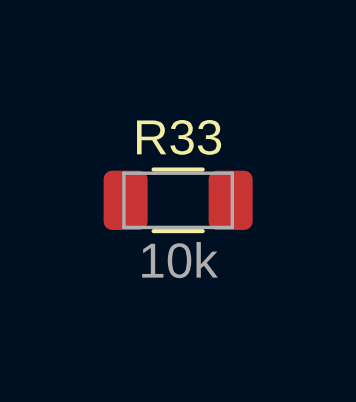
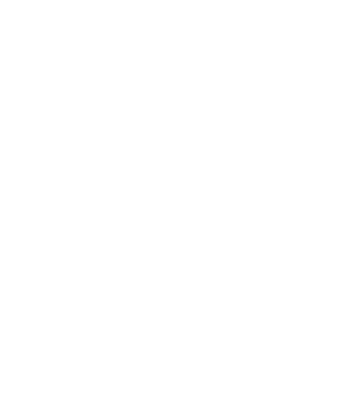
R33: 10k (178, 200) -> none

